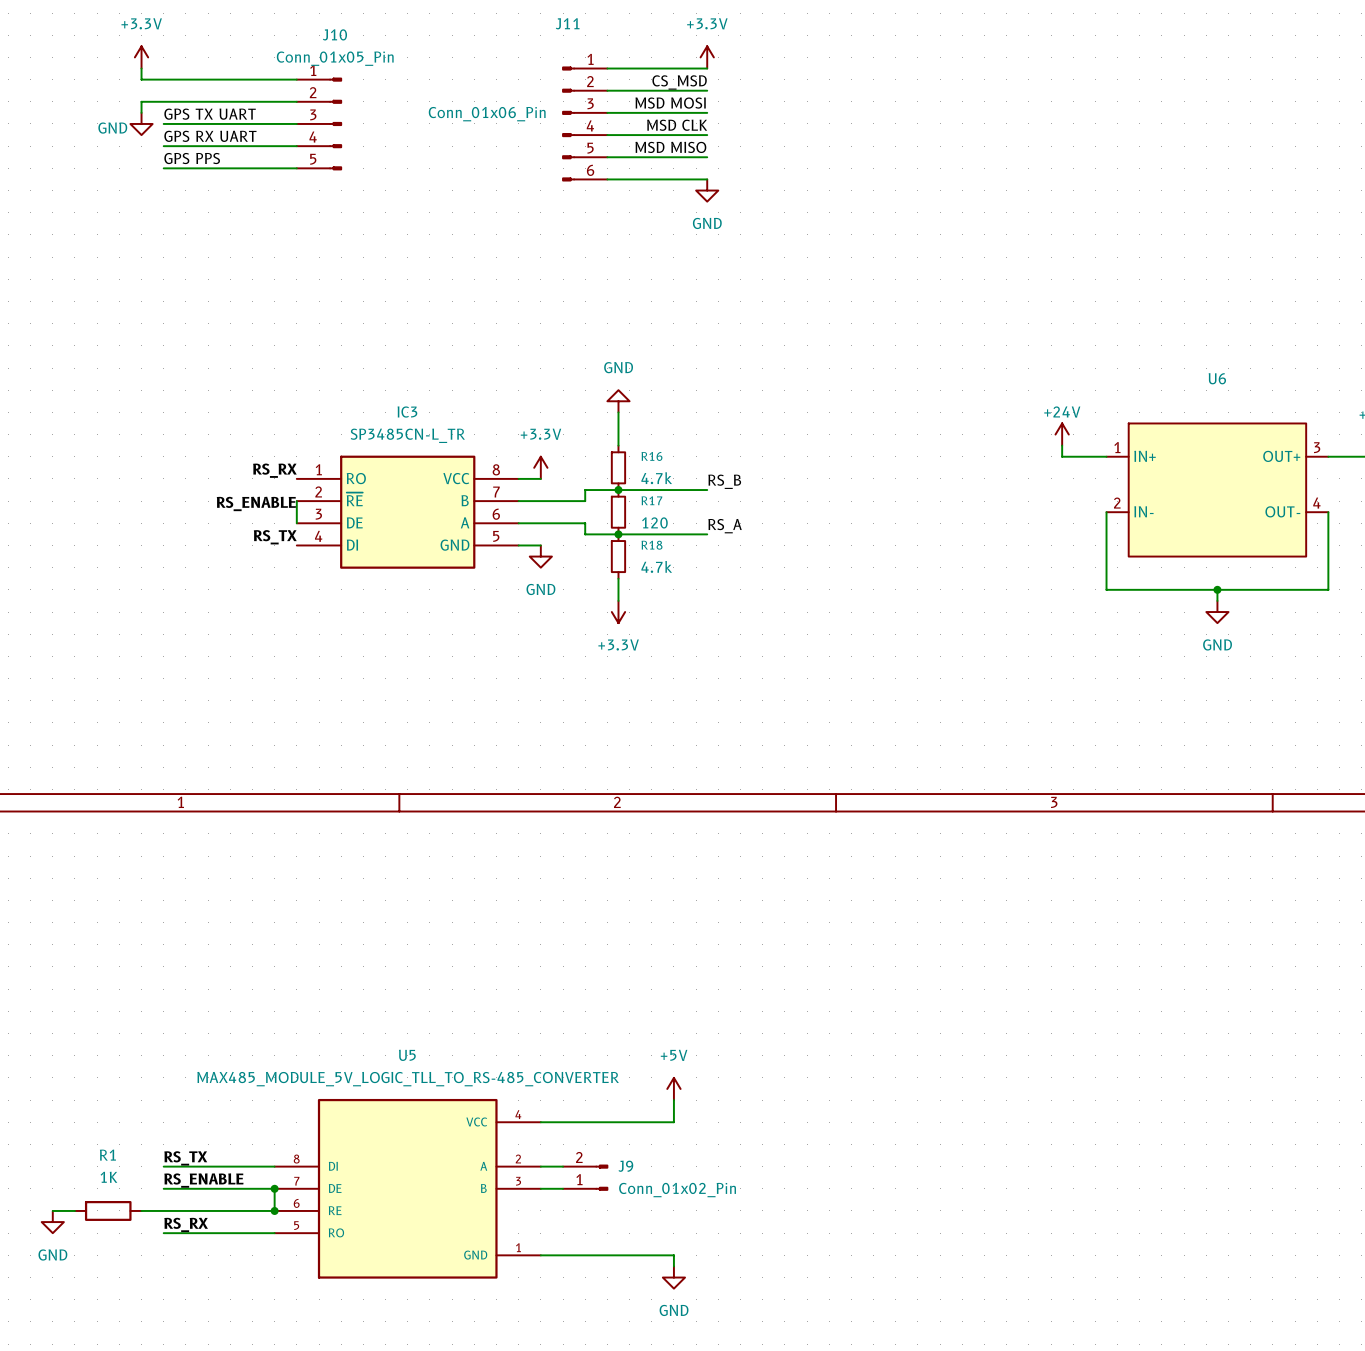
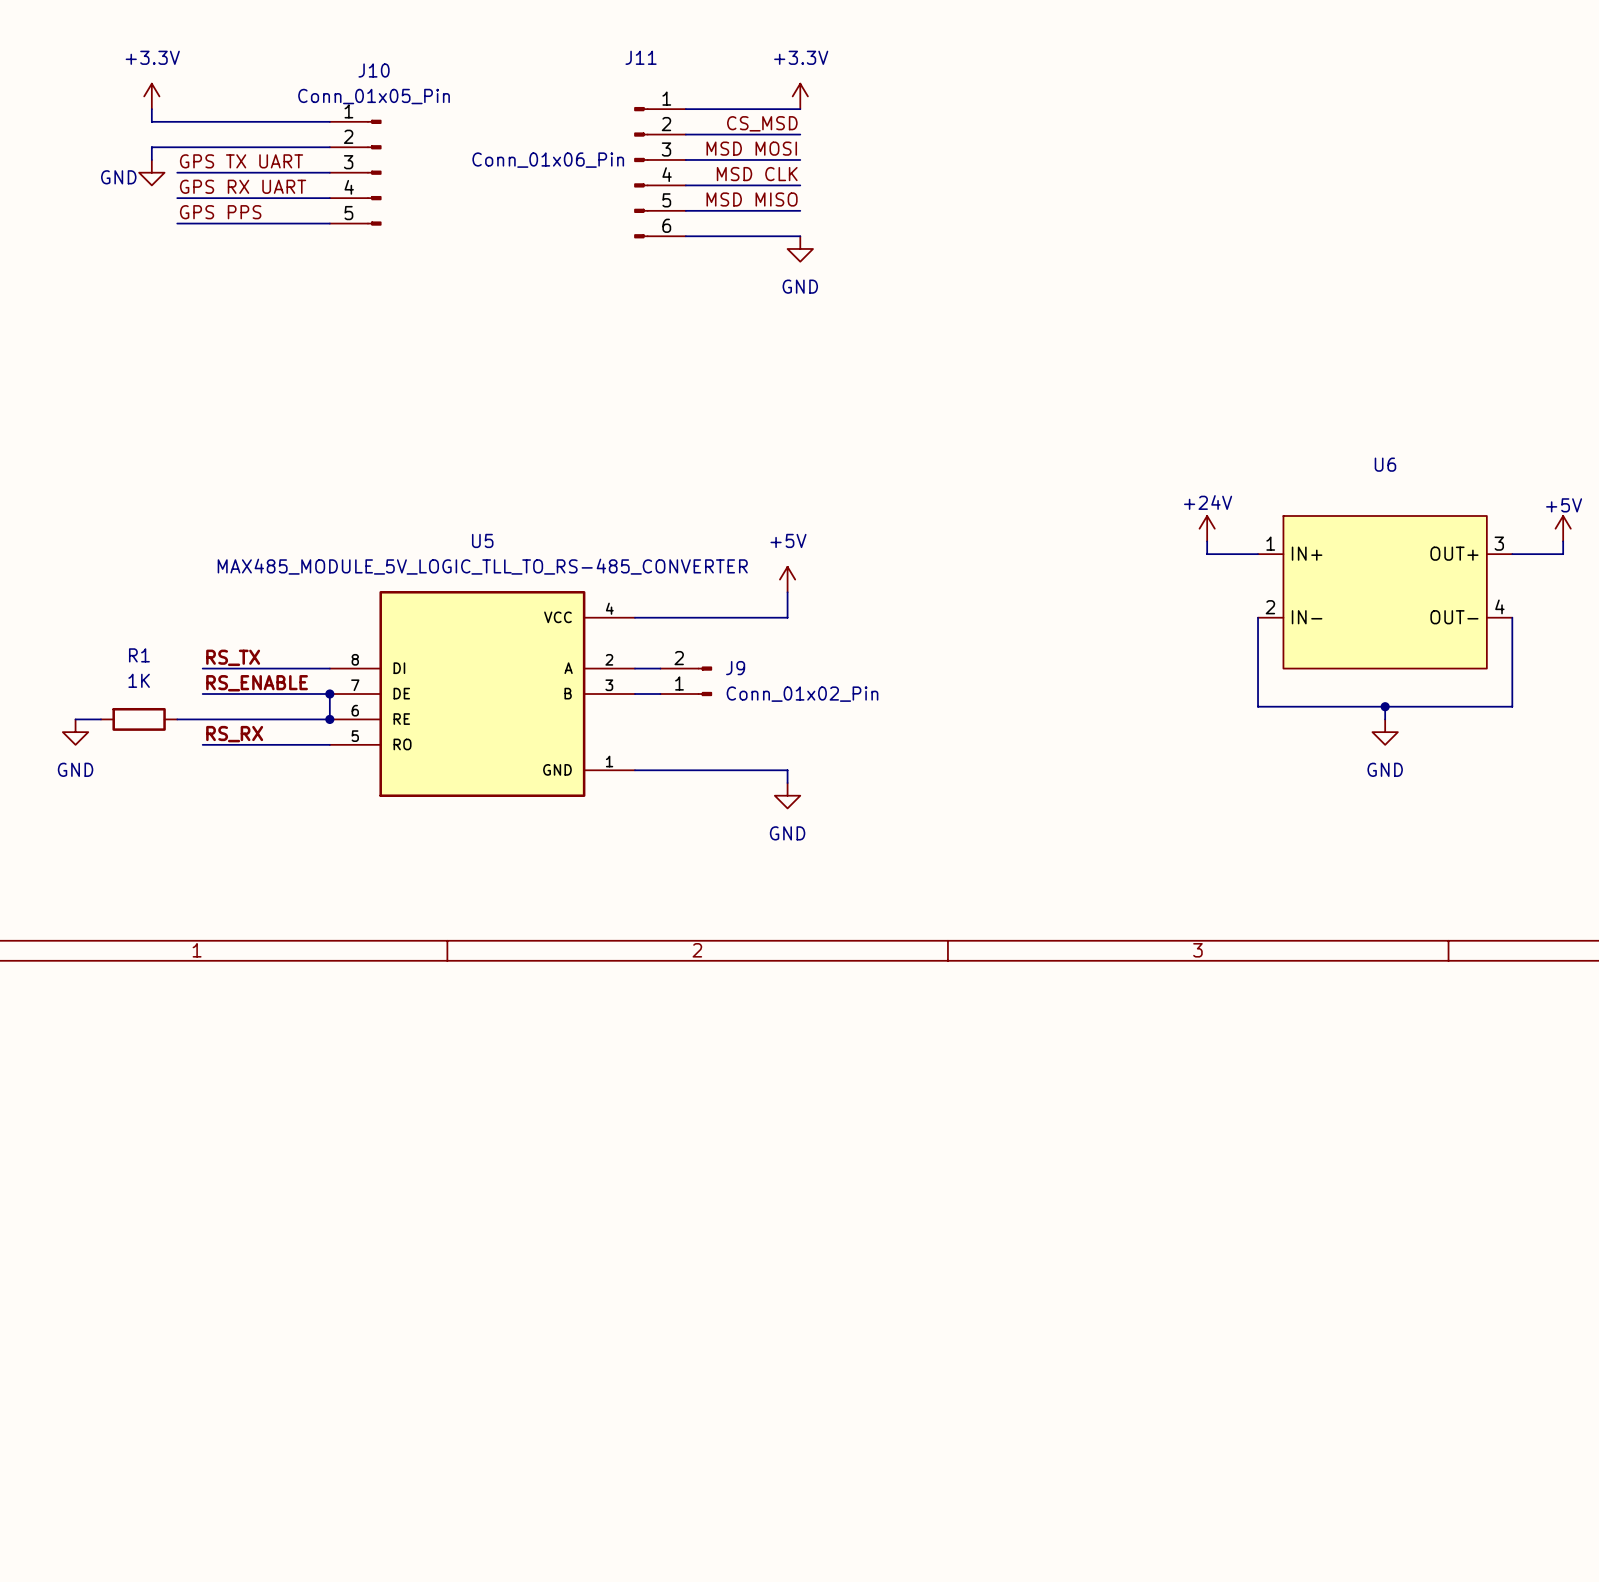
power symbol: GND (618, 401) -> none
wire: (618, 412) (618, 445) -> none
power symbol: +3.3V (540, 467) -> none
R16: 4.7k (618, 467) -> none
label position: RS_RX (274, 470) -> RS_RX (234, 734)
wire: (518, 478) (540, 478) -> (634, 694) (660, 694)
power symbol: none -> +5V (787, 579)
label: RS_B (724, 481) -> none
junction: (618, 490) -> none
wire: none -> (787, 592) (787, 617) (634, 617)
wire: (707, 490) (585, 490) (585, 501) (518, 501) -> none
wire: (296, 501) (296, 523) -> none
label position: RS_ENABLE (256, 503) -> RS_ENABLE (257, 683)
IC3: SP3485CN-L_TR (407, 512) -> none
R17: 120 (618, 512) -> none
wire: (518, 523) (585, 523) (585, 534) (707, 534) -> none
label: RS_A (725, 526) -> none
junction: (618, 534) -> none
label position: RS_TX (275, 537) -> RS_TX (233, 657)
wire: (518, 545) (540, 545) -> (634, 668) (660, 668)
wire: none -> (202, 668) (329, 668)
power symbol: GND (540, 556) -> none
R18: 4.7k (618, 556) -> none
wire: none -> (202, 694) (329, 694) (329, 719) (177, 719)
junction: none -> (329, 694)
wire: (618, 578) (618, 600) -> none
wire: none -> (75, 719) (100, 719)
junction: none -> (329, 719)
power symbol: none -> GND (75, 732)
power symbol: +3.3V (618, 612) -> none
wire: none -> (202, 744) (329, 744)
wire: none -> (634, 770) (787, 770) (787, 783)
power symbol: none -> GND (787, 795)
power symbol: +5V (673, 1088) -> none
wire: (673, 1100) (673, 1122) (540, 1122) -> none
label: RS_TX (185, 1158) -> none
wire: (163, 1166) (274, 1166) -> none
wire: (540, 1166) (563, 1166) -> none
J9 position: (585, 1177) -> (686, 681)
label: RS_ENABLE (203, 1180) -> none
wire: (163, 1188) (274, 1188) (274, 1210) (141, 1210) -> none
junction: (274, 1188) -> none
U5 position: (407, 1188) -> (482, 694)
wire: (540, 1188) (563, 1188) -> none
wire: (52, 1210) (74, 1210) -> none
R1 position: (108, 1210) -> (139, 719)
junction: (274, 1210) -> none
power symbol: GND (52, 1222) -> none
label: RS_RX (186, 1224) -> none
wire: (163, 1233) (274, 1233) -> none
wire: (540, 1255) (673, 1255) (673, 1266) -> none
power symbol: GND (673, 1277) -> none

